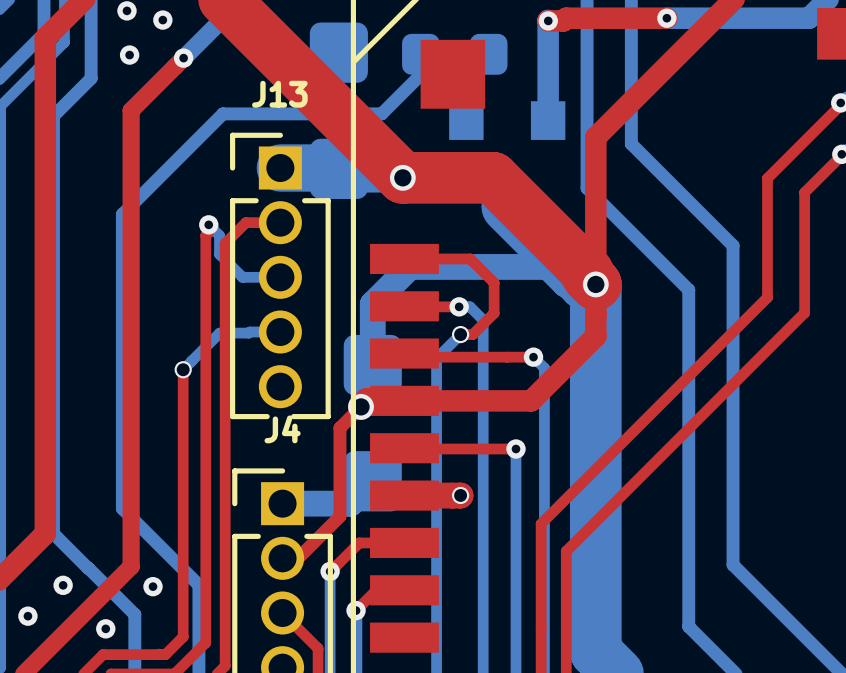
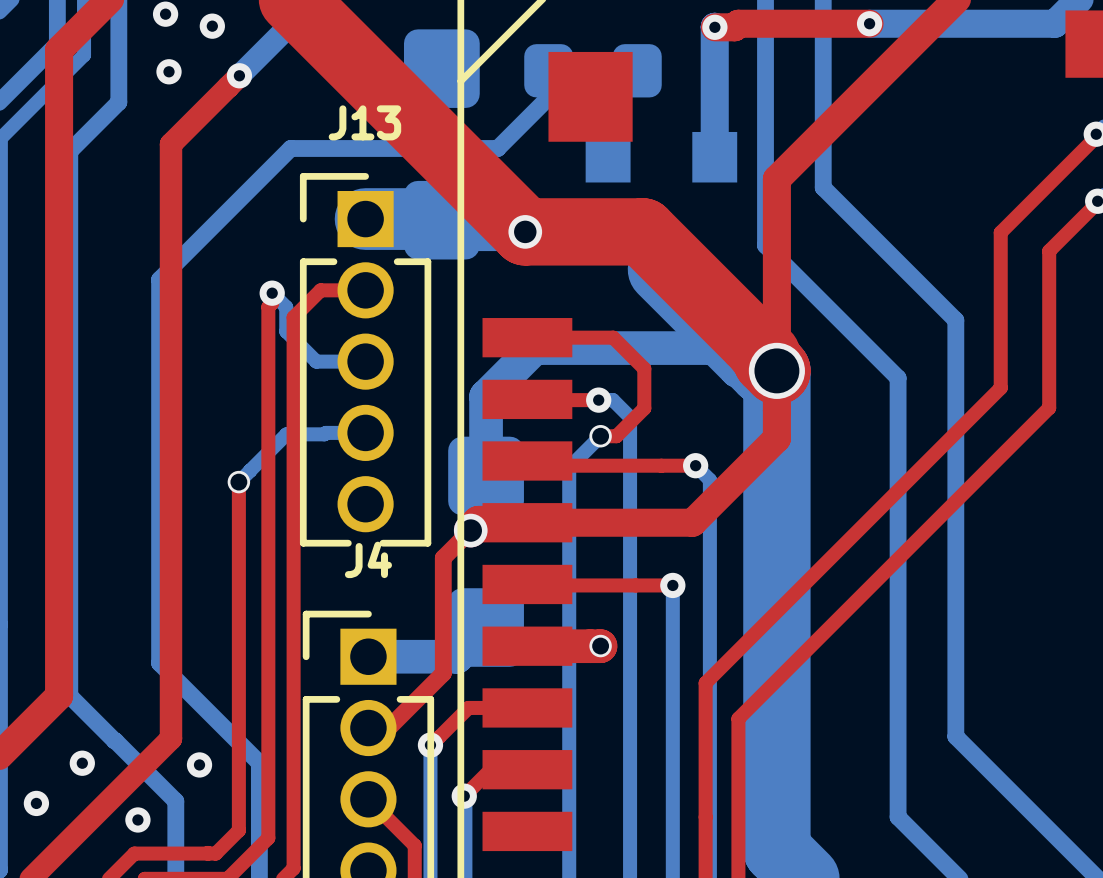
via size: [582, 271, 609, 298] -> [748, 342, 805, 399]

